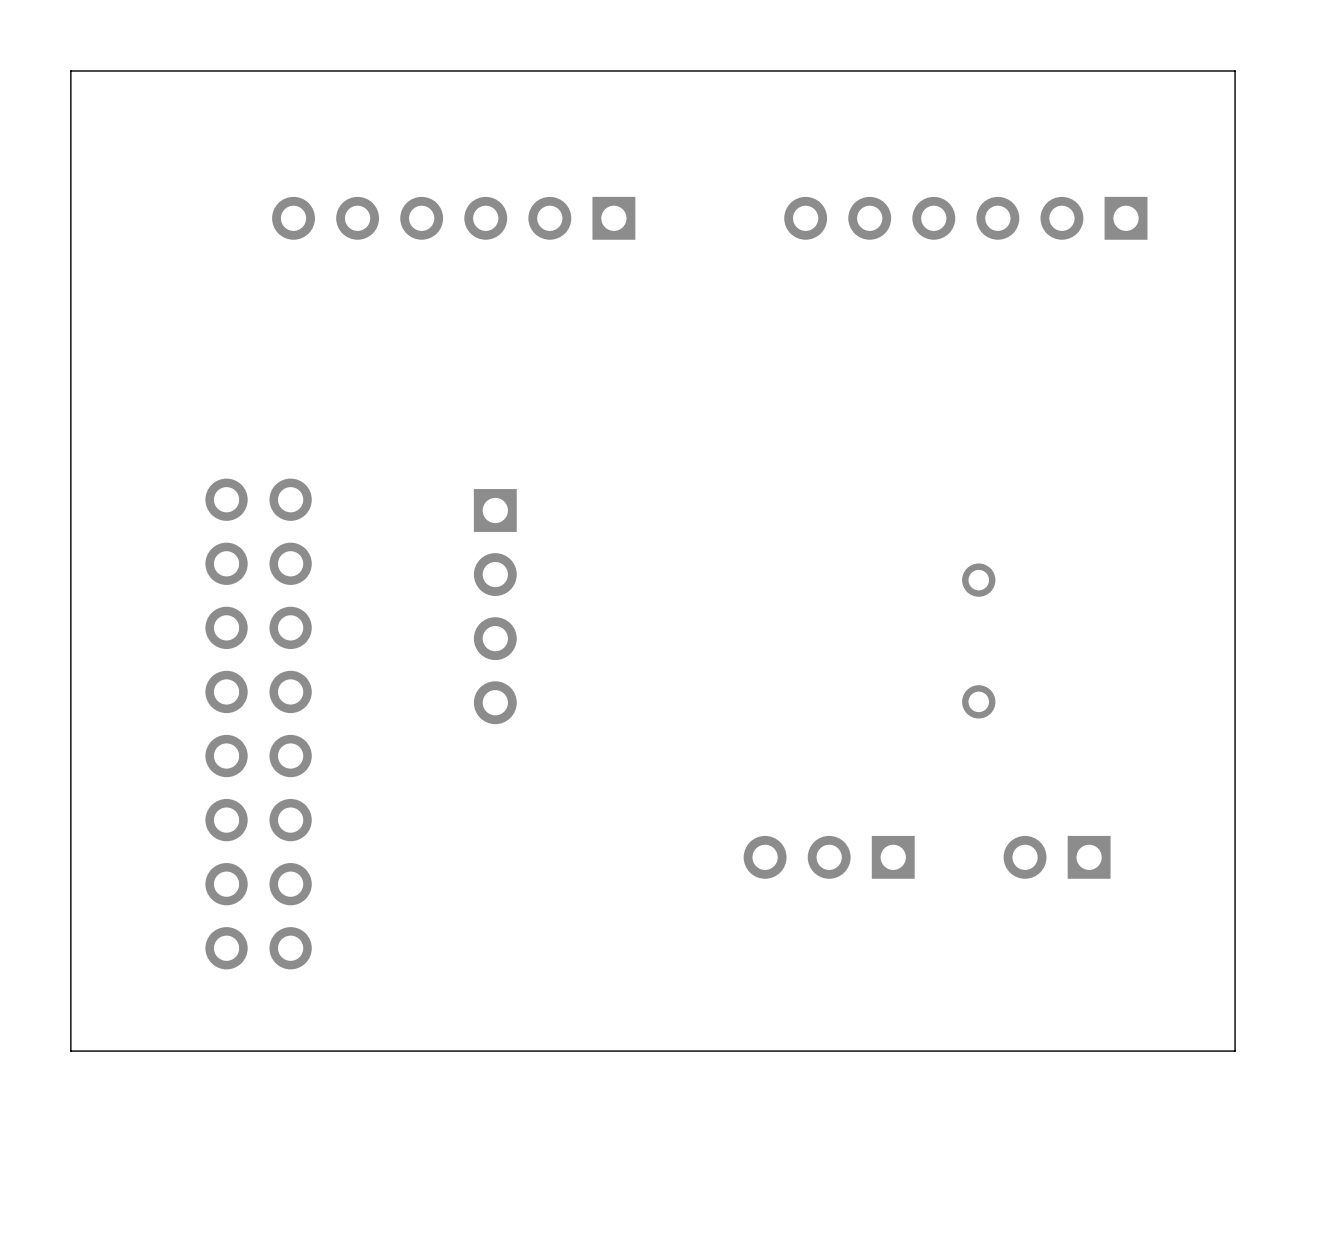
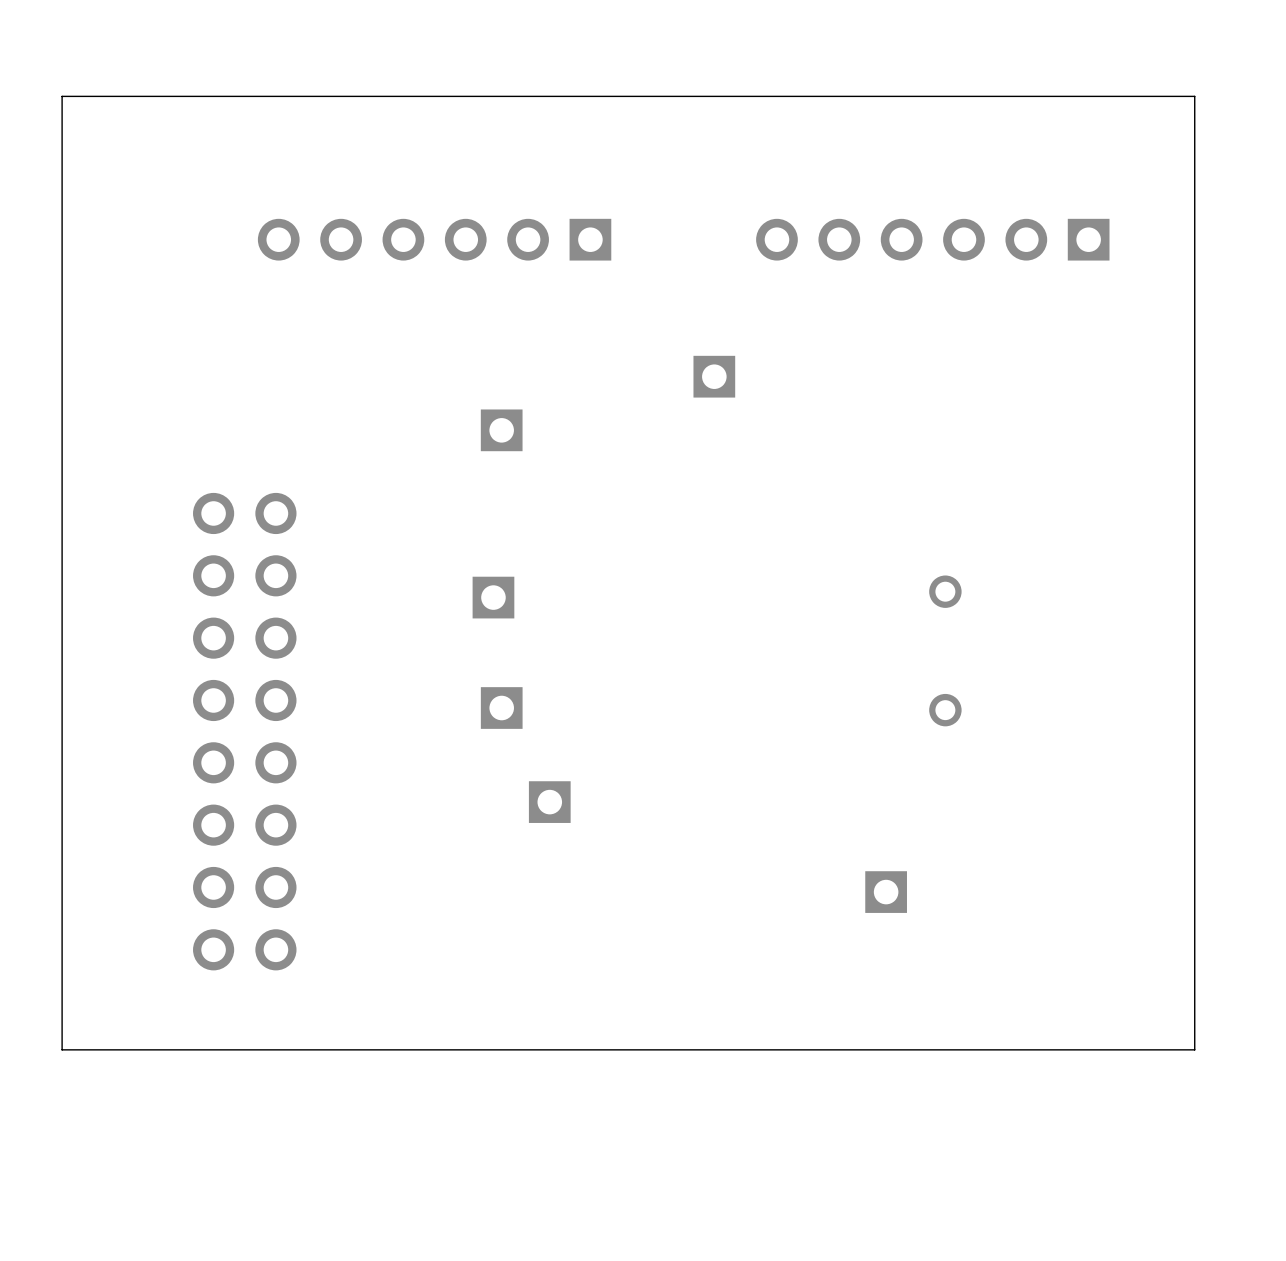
part: none -> (714, 376)
part: none -> (501, 430)
part: none -> (493, 597)
part: (495, 606) -> none
part: none -> (501, 708)
part: none -> (549, 802)
part: (829, 857) -> none
part: (1057, 857) -> none
part: none -> (886, 892)

